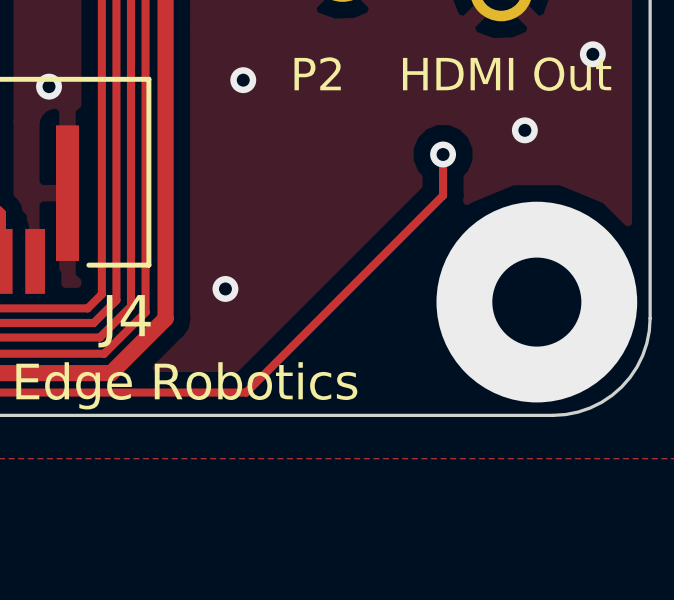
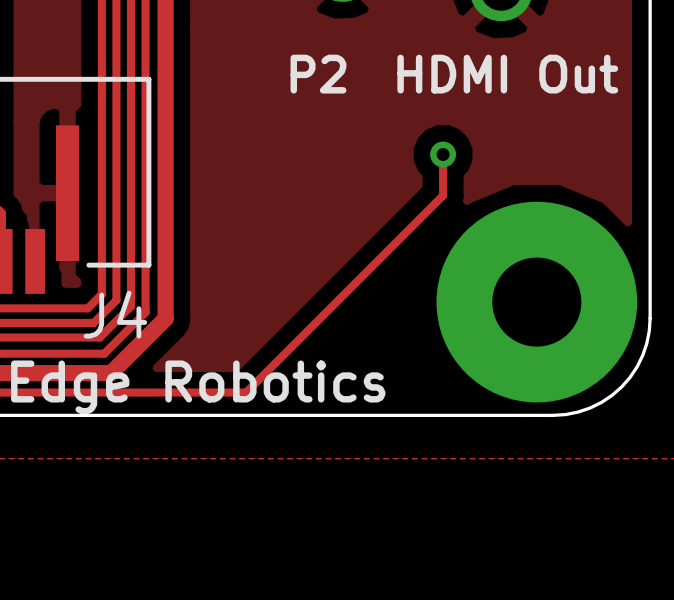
via: (592, 54) -> none
via: (243, 80) -> none
via: (49, 86) -> none
via: (524, 130) -> none
via: (225, 288) -> none

